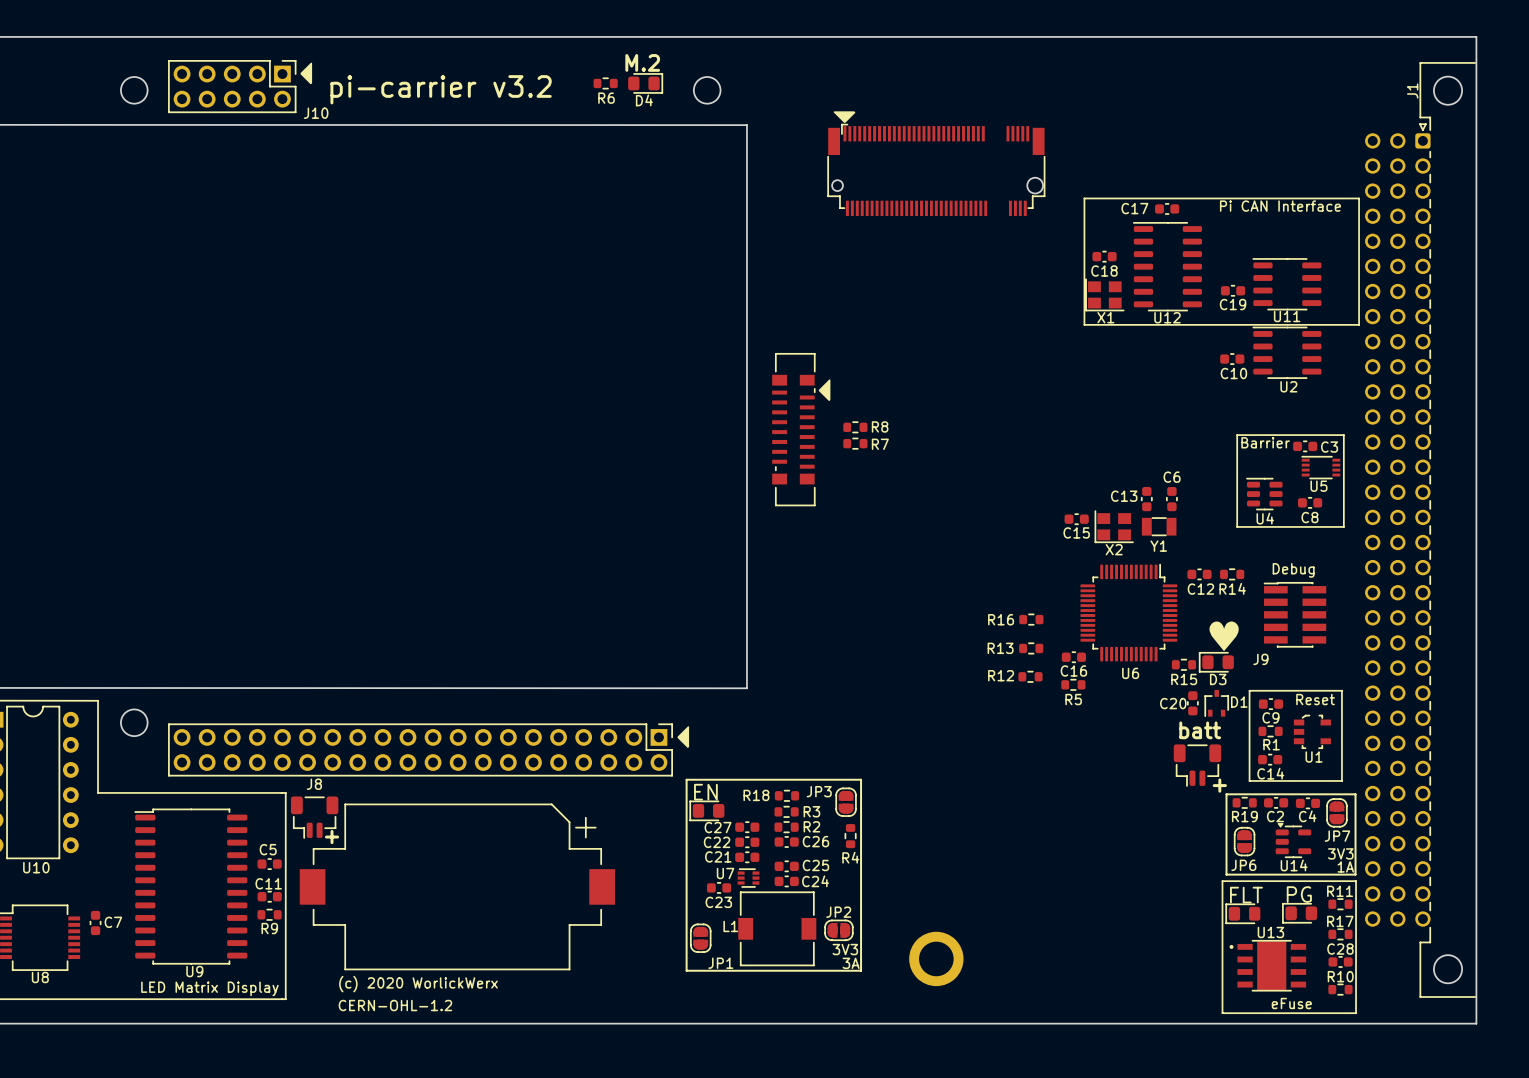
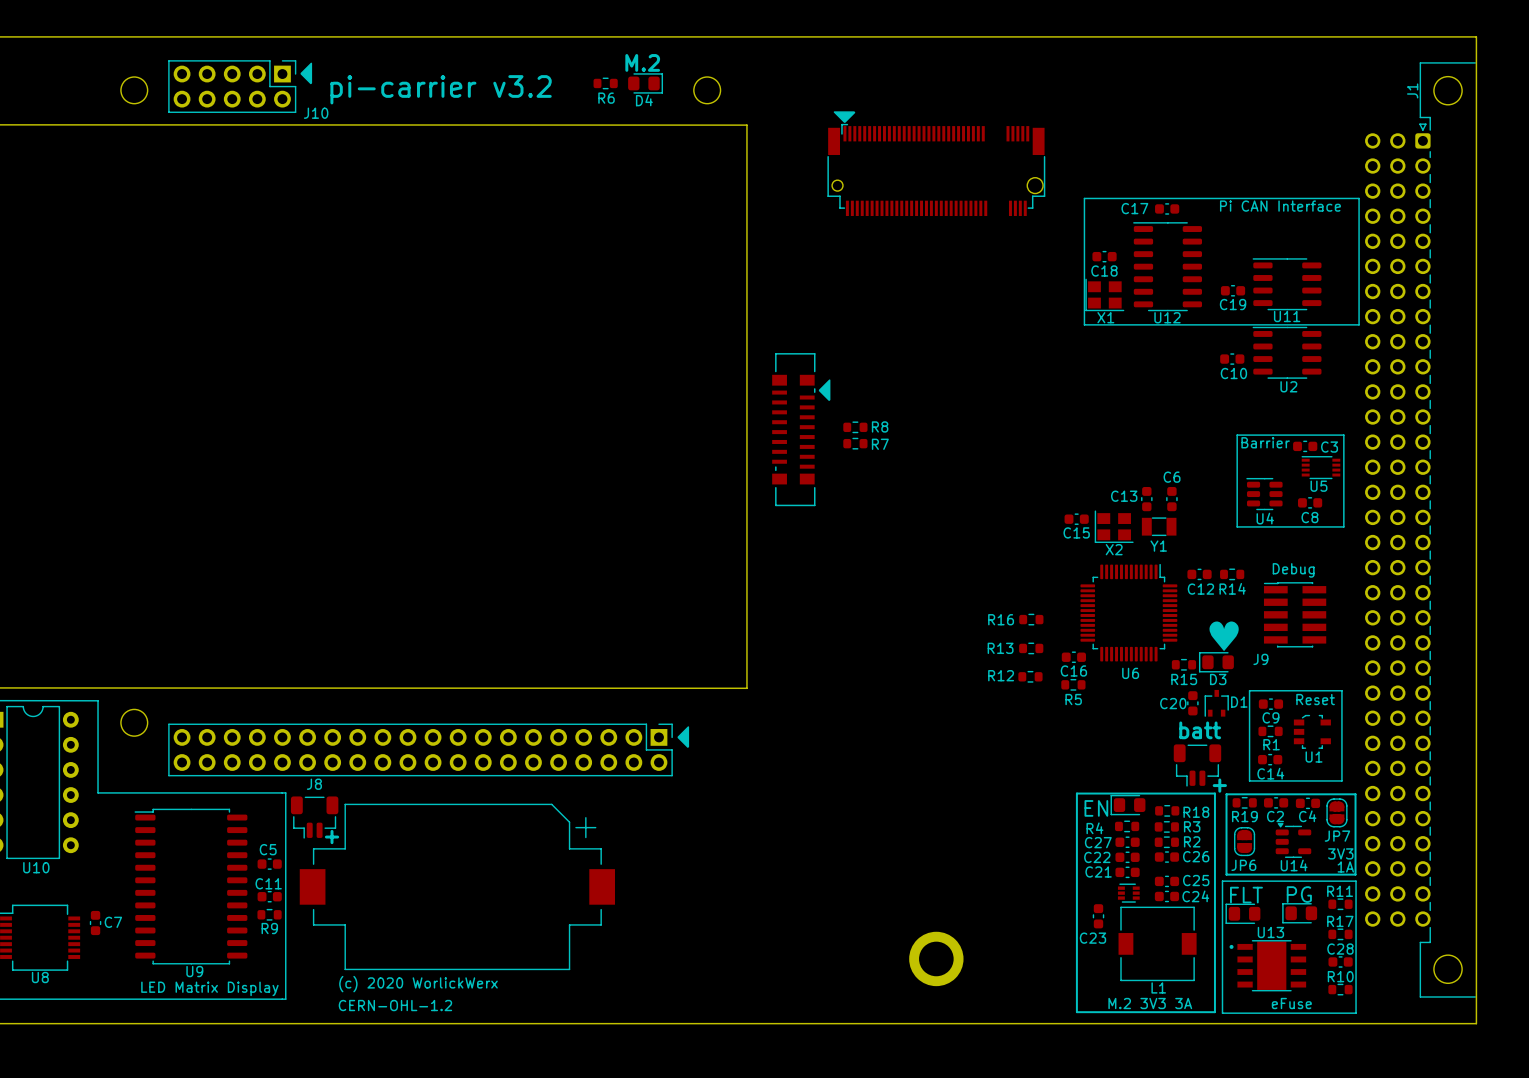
line: (686, 779) (861, 779) (861, 970) (686, 970) (686, 779) -> none
text: EN (705, 792) -> none
line: none -> (1076, 793) (1214, 793) (1214, 1012) (1076, 1012) (1076, 793)
R18 name position: R18 (756, 795) -> R18 (1196, 812)
R18 position: (786, 795) -> (1167, 810)
JP3: (846, 802) -> none
part: none -> (1128, 805)
text: none -> EN (1096, 808)
part: (707, 810) -> none
R3 position: (786, 811) -> (1166, 826)
C27 position: (747, 827) -> (1127, 842)
R2 position: (786, 827) -> (1166, 842)
R4 rotation: 0° (850, 836) -> 90° clockwise (1127, 826)
R4 position: (850, 836) -> (1127, 826)
C26 position: (786, 841) -> (1166, 857)
C22 position: (747, 842) -> (1127, 857)
C21 position: (747, 857) -> (1127, 872)
C25 position: (786, 866) -> (1166, 881)
U7: (748, 878) -> none
C24 position: (786, 881) -> (1166, 896)
C23 rotation: 0° (719, 887) -> 90° clockwise (1098, 916)
C23 position: (719, 887) -> (1098, 916)
part: none -> (1128, 893)
L1 name position: L1 (730, 926) -> L1 (1158, 987)
L1 position: (777, 928) -> (1157, 943)
JP2: (838, 930) -> none
JP1: (700, 938) -> none
text: 3V3 (845, 949) -> none
text: 3A (851, 963) -> none
text: none -> M.2 3V3 3A (1150, 1003)

